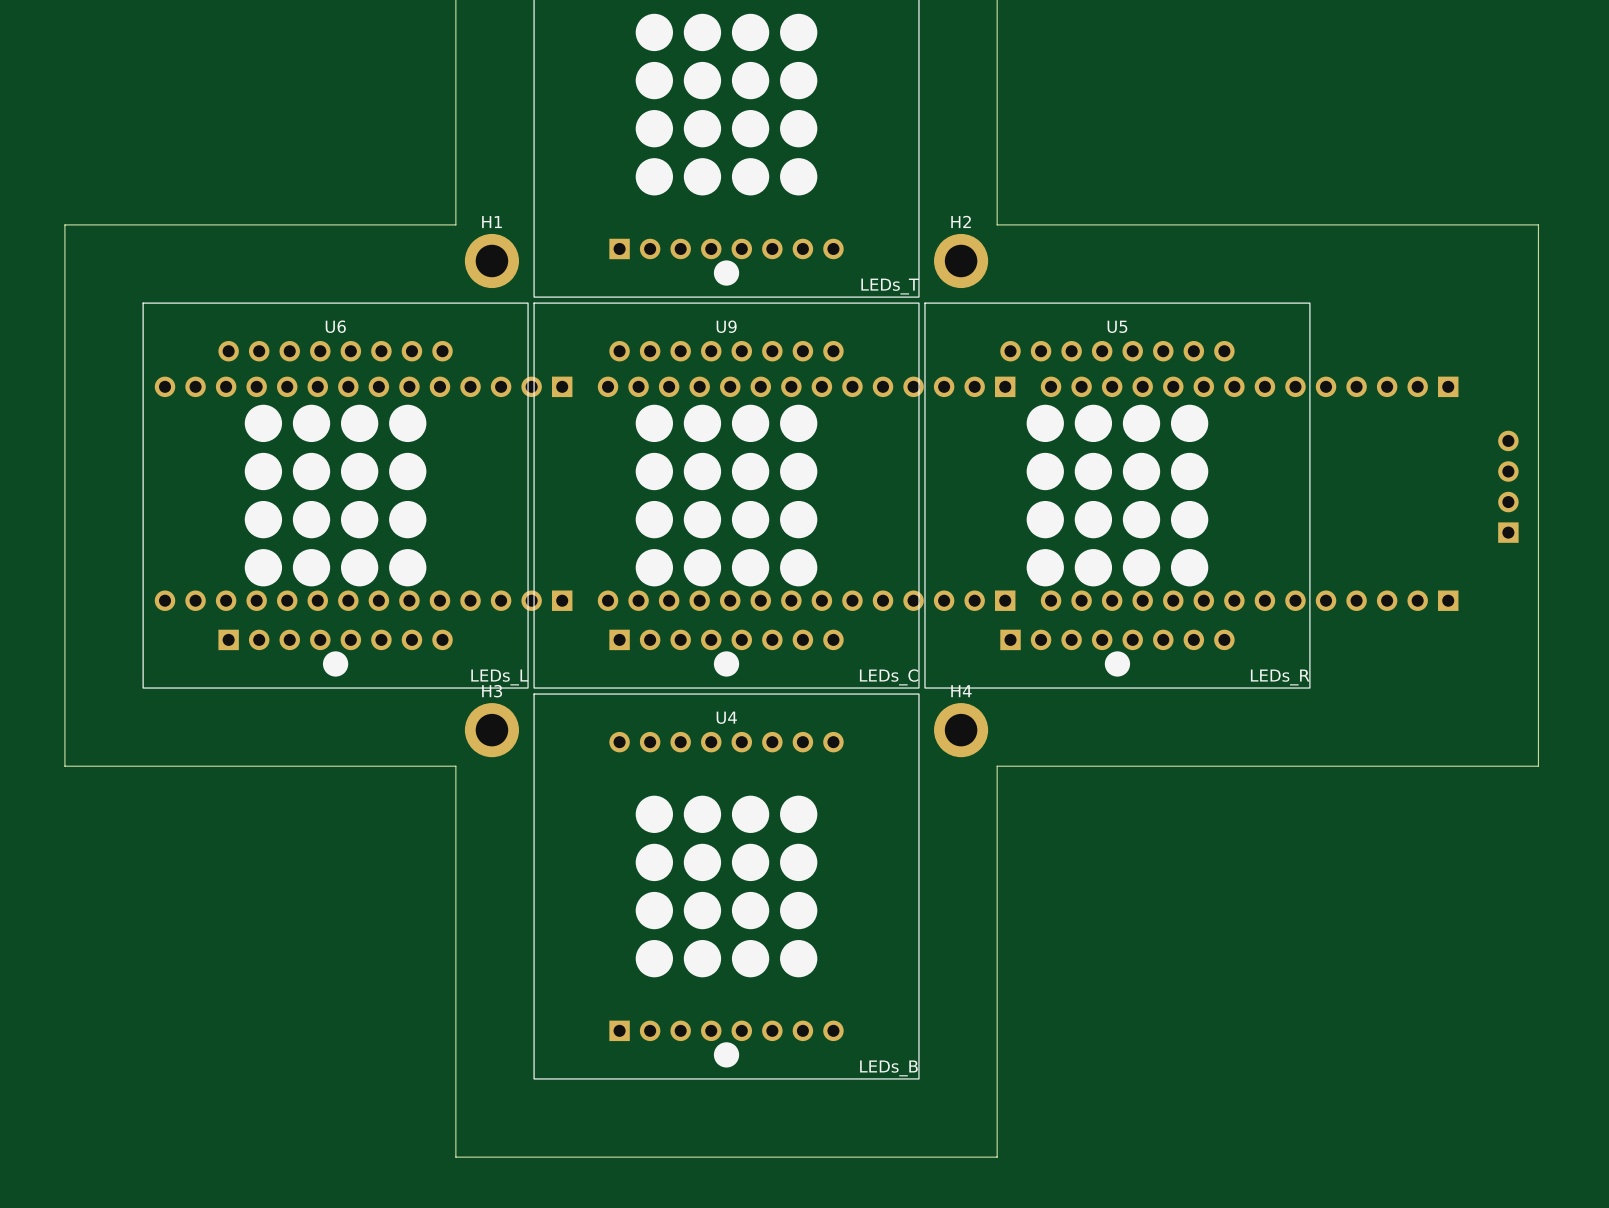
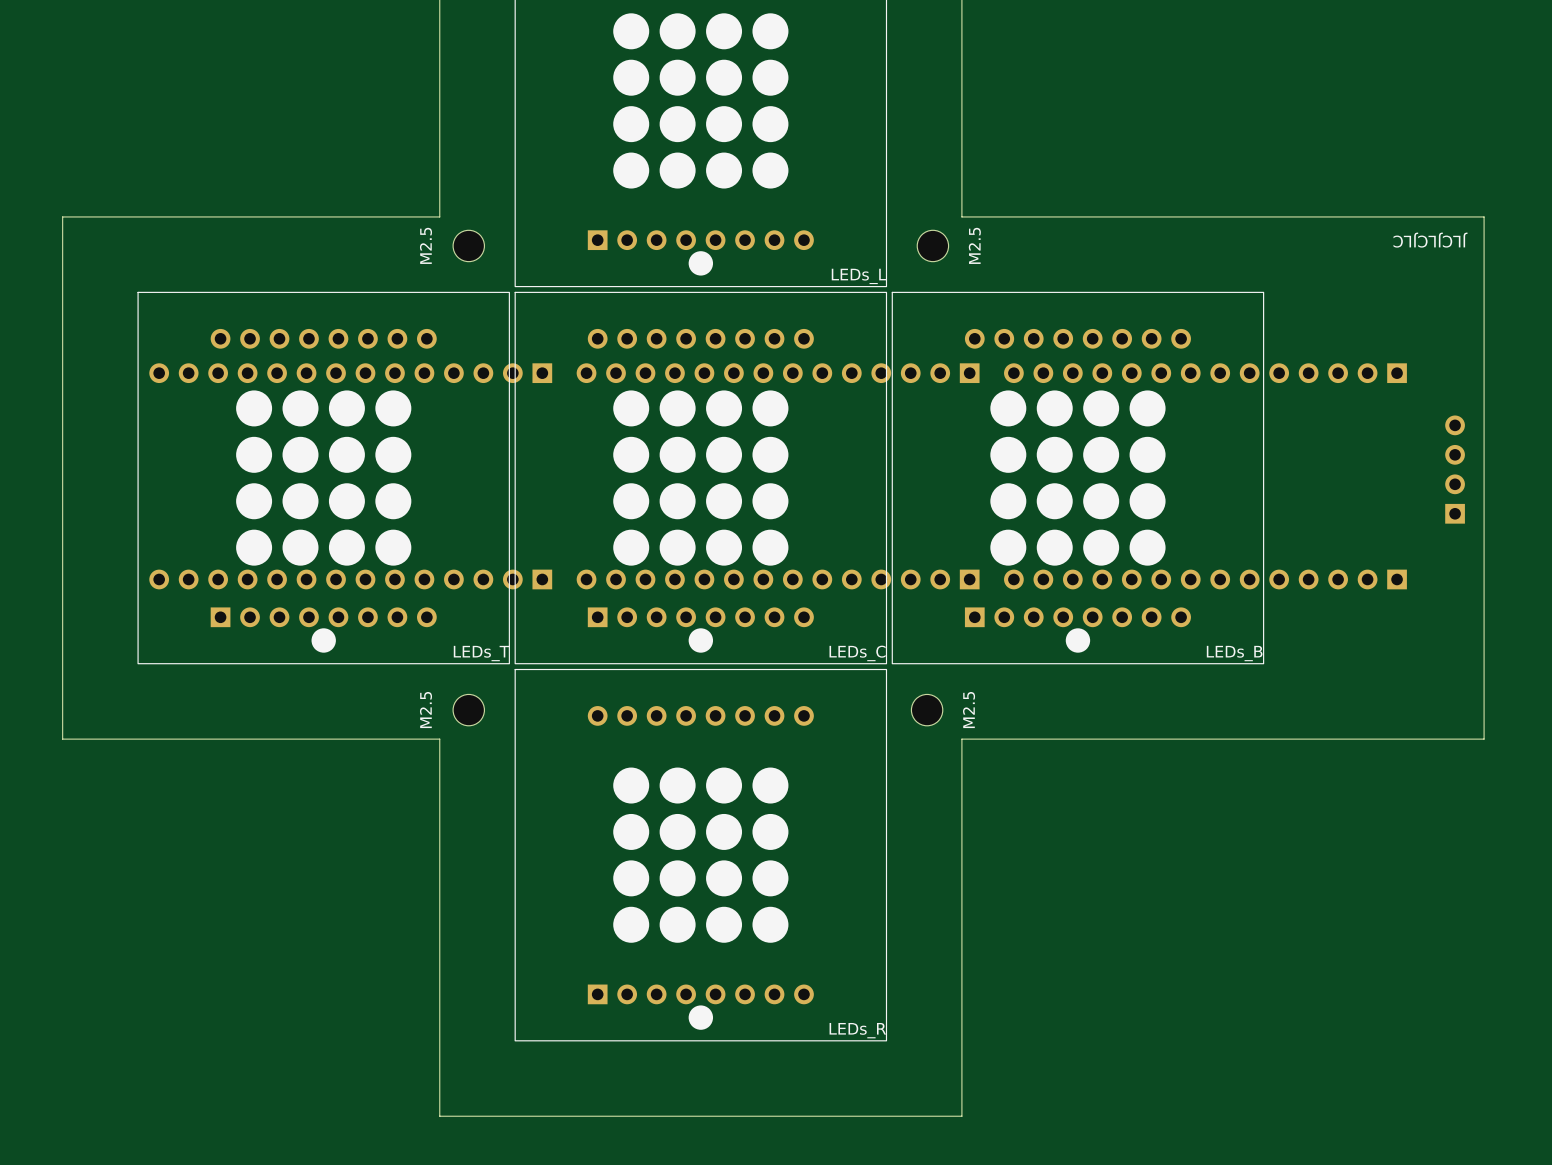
text: none -> JLCJLCJLC (1430, 240)
part: none -> M2.5 (468, 245)
part: none -> M2.5 (932, 245)
H1: (491, 261) -> none
H2: (961, 261) -> none
part value: LEDs_T (890, 286) -> LEDs_L (859, 276)
U6 name: U6 (335, 326) -> none
U9 name: U9 (726, 326) -> none
U5 name: U5 (1117, 326) -> none
U6 value: LEDs_L (499, 677) -> LEDs_T (481, 653)
U5 value: LEDs_R (1280, 677) -> LEDs_B (1234, 653)
U4 name: U4 (726, 717) -> none
H3: (491, 730) -> none
H4: (961, 730) -> none
part: none -> M2.5 (468, 710)
part: none -> M2.5 (927, 710)
U4 value: LEDs_B (888, 1068) -> LEDs_R (857, 1030)

